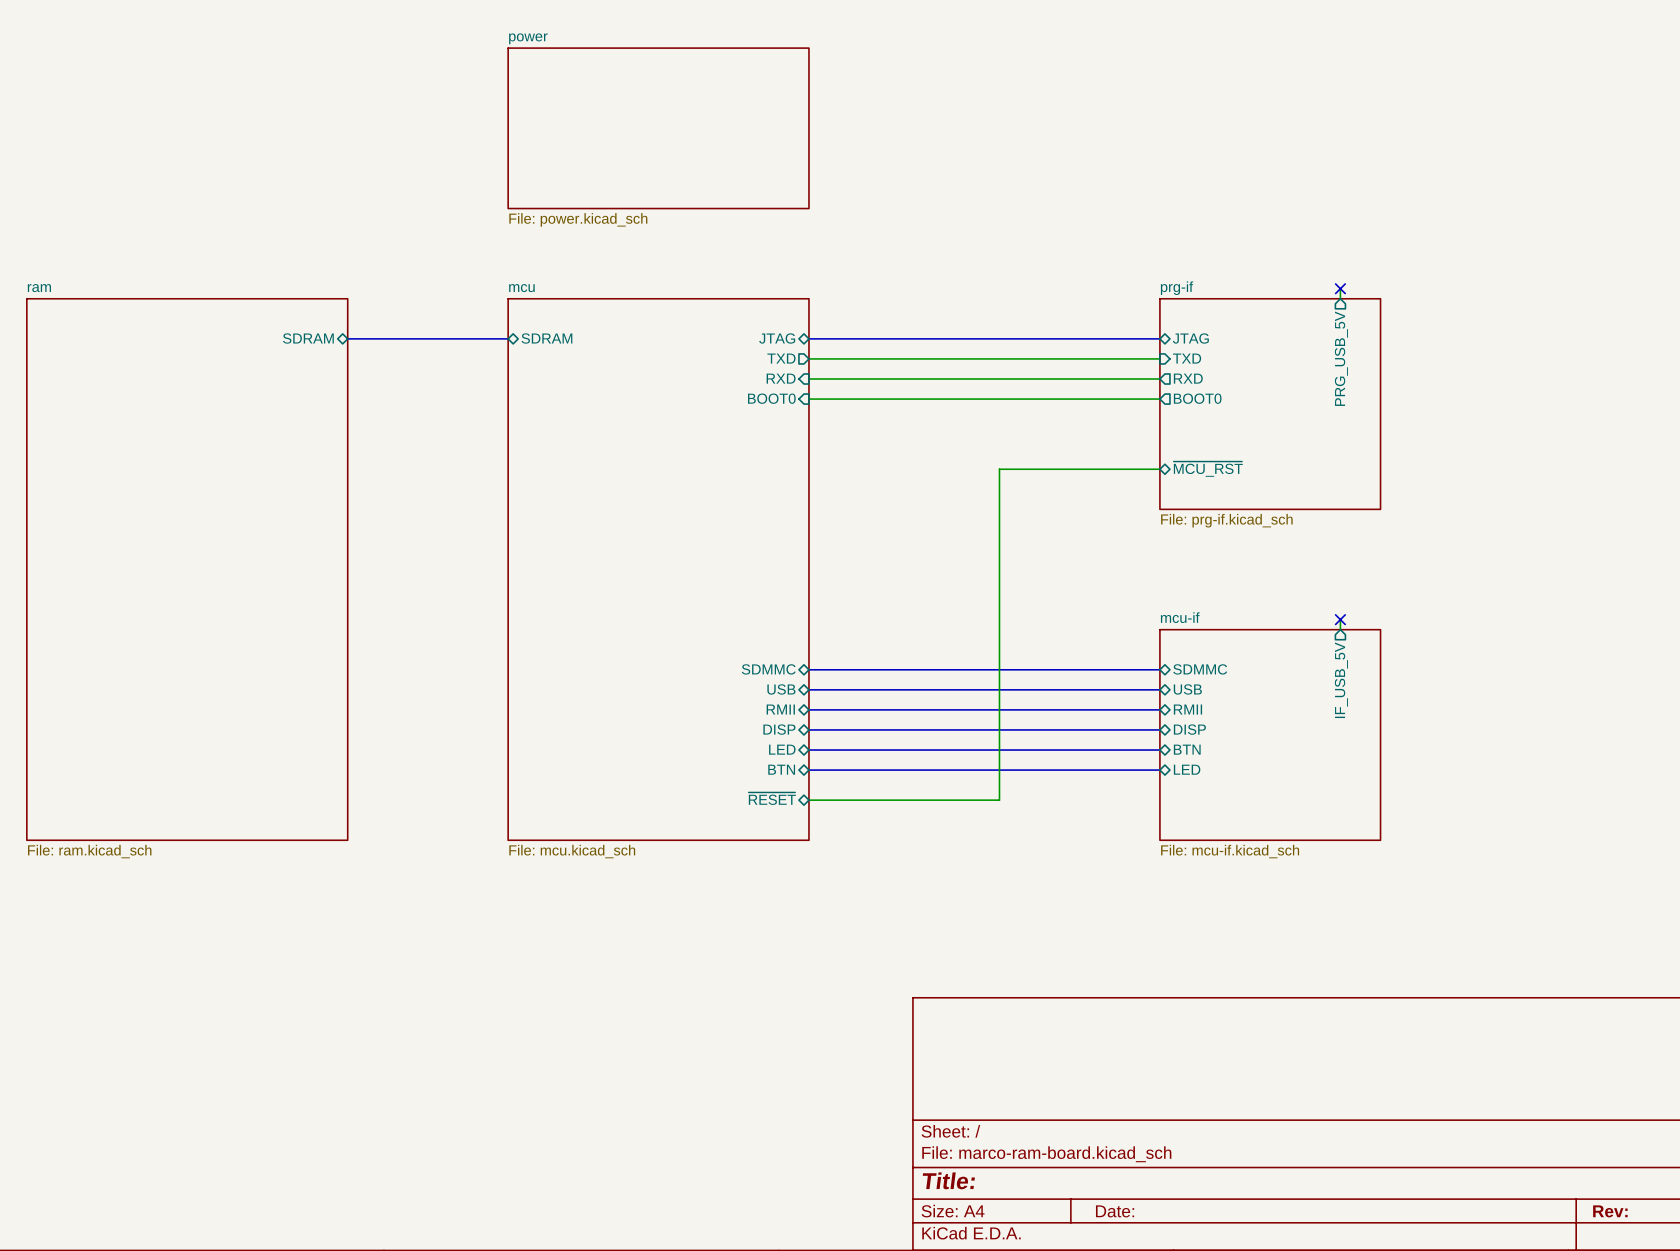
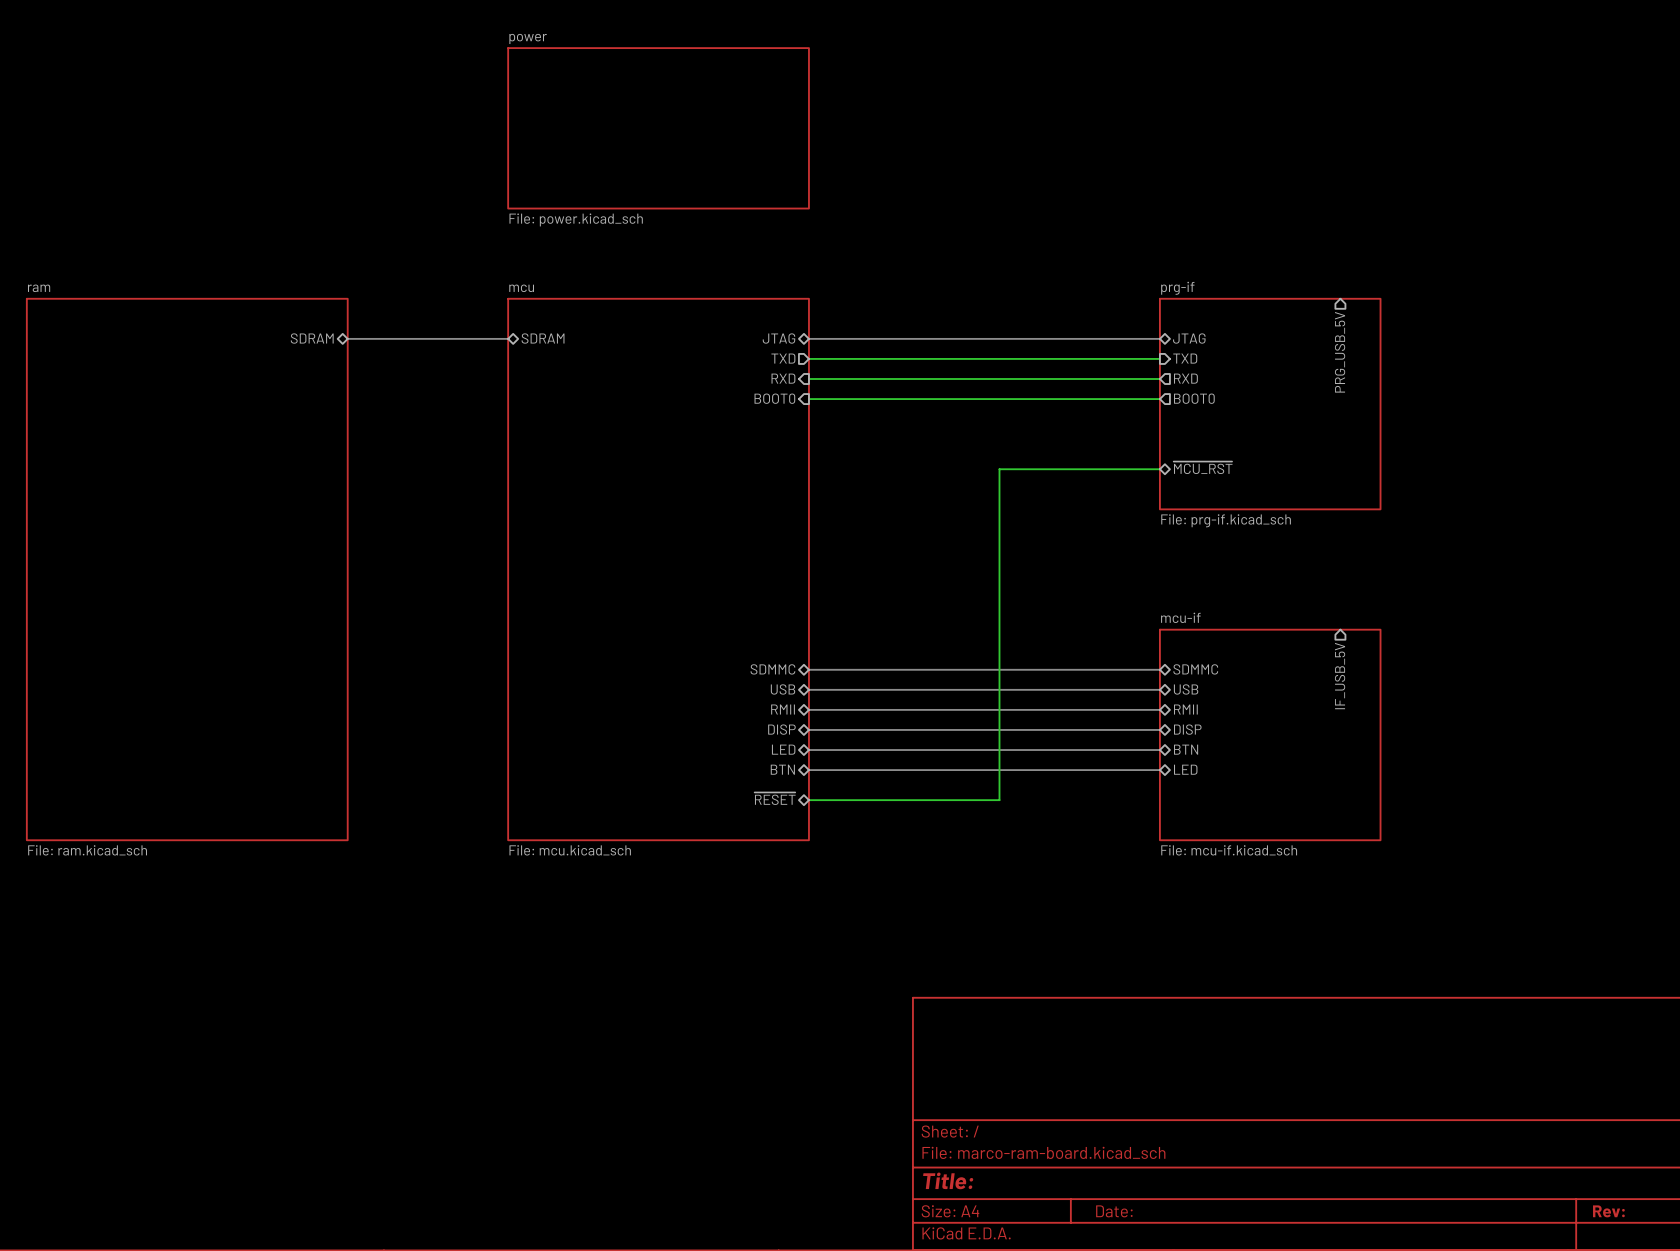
wire: (1340, 288) (1340, 298) -> none
no-connect mark: (1340, 288) -> none
wire: (1340, 619) (1340, 629) -> none
no-connect mark: (1340, 619) -> none

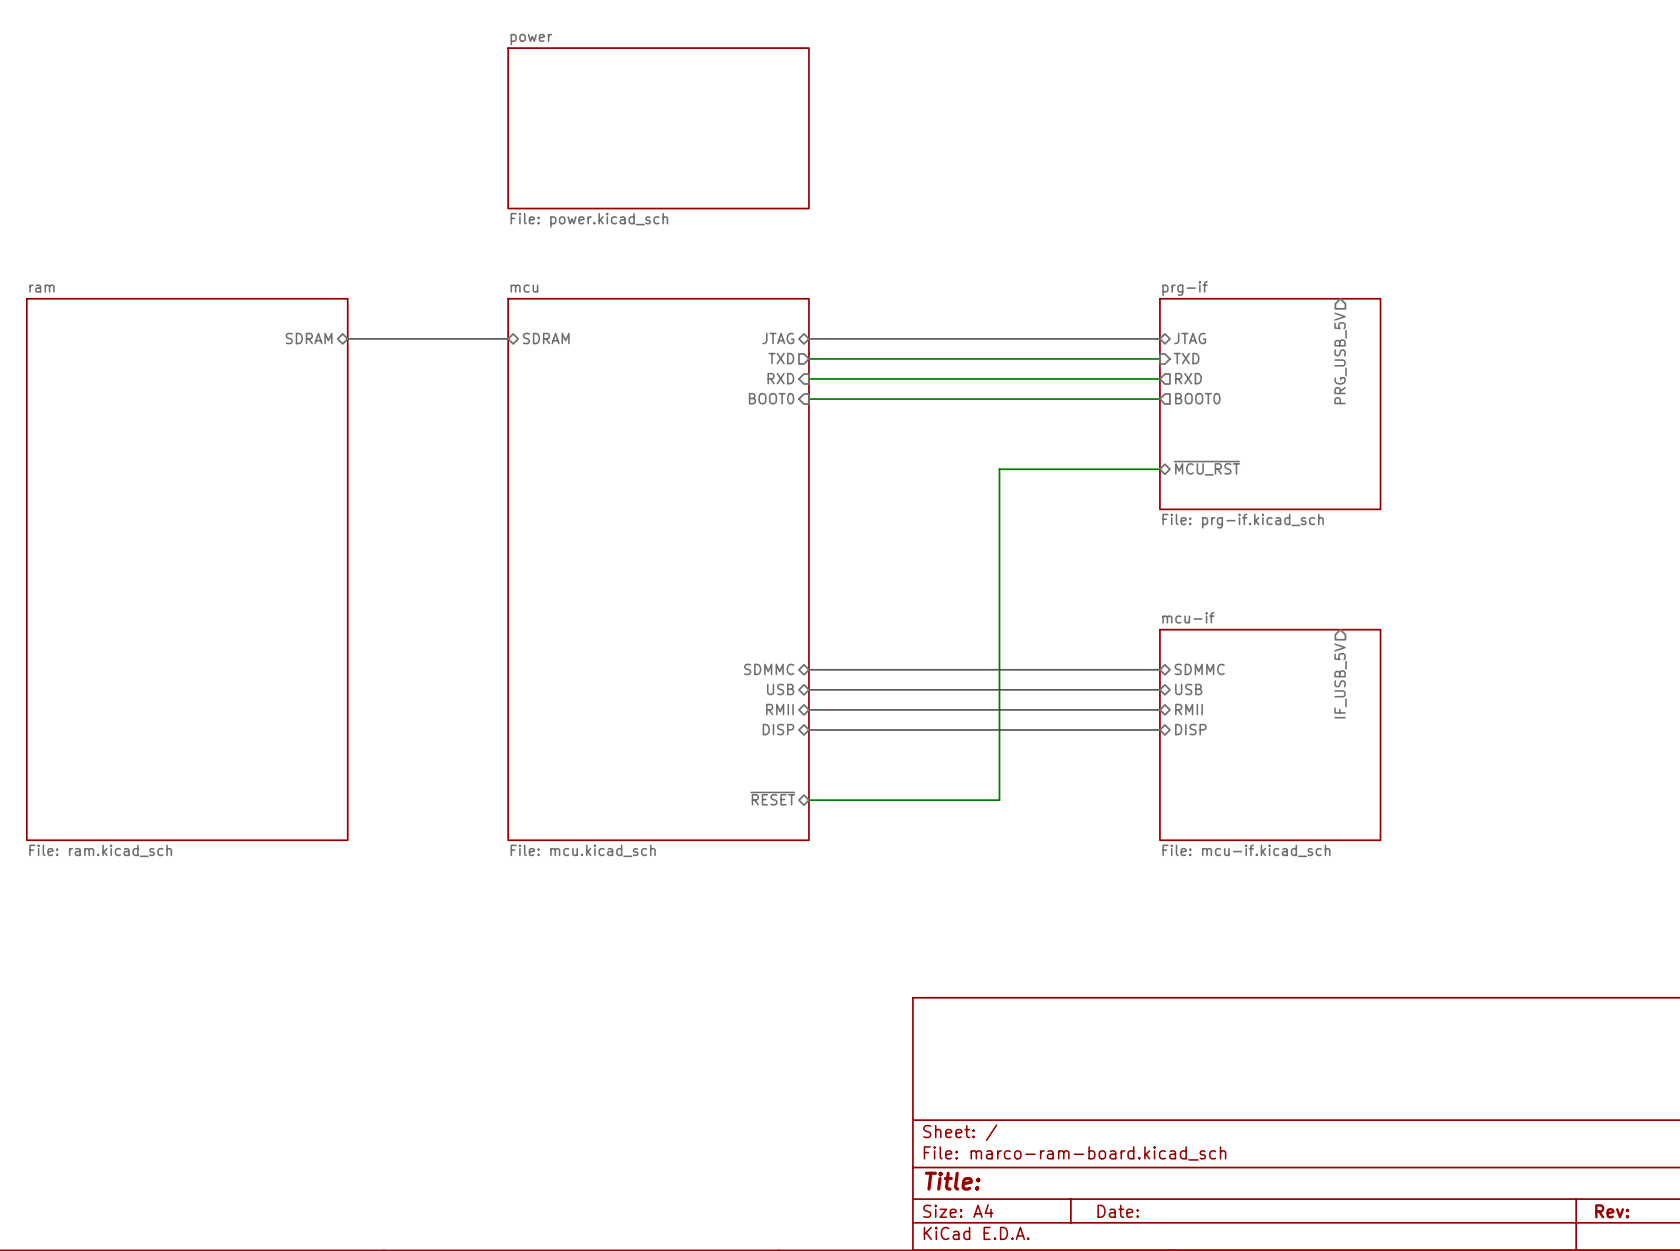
sheet pin: LED (783, 749) -> none
sheet pin: BTN (1186, 749) -> none
bus: (808, 750) (1159, 750) -> none
sheet pin: BTN (782, 769) -> none
sheet pin: LED (1185, 769) -> none
bus: (808, 770) (1159, 770) -> none

